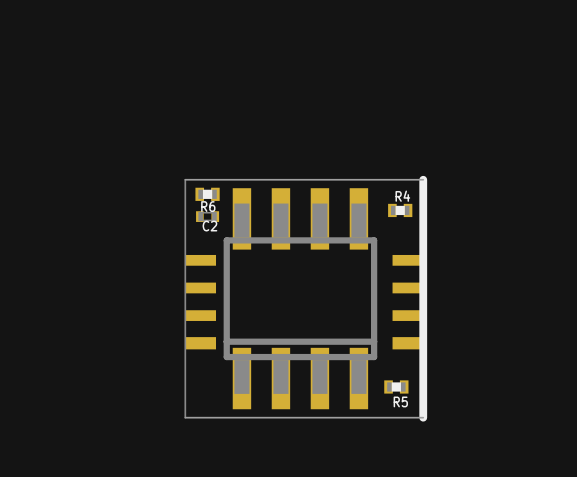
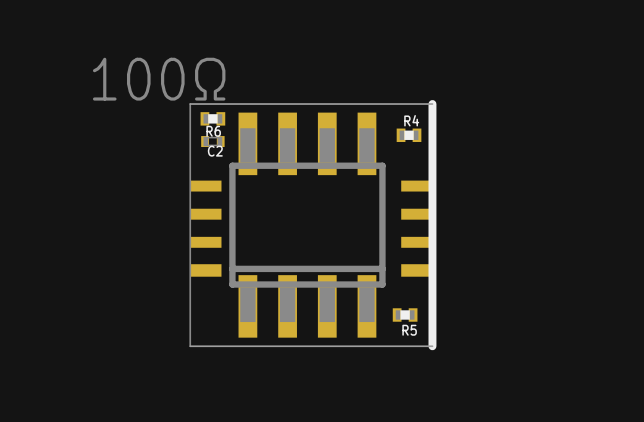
R6 value: none -> 100Ω (159, 79)

